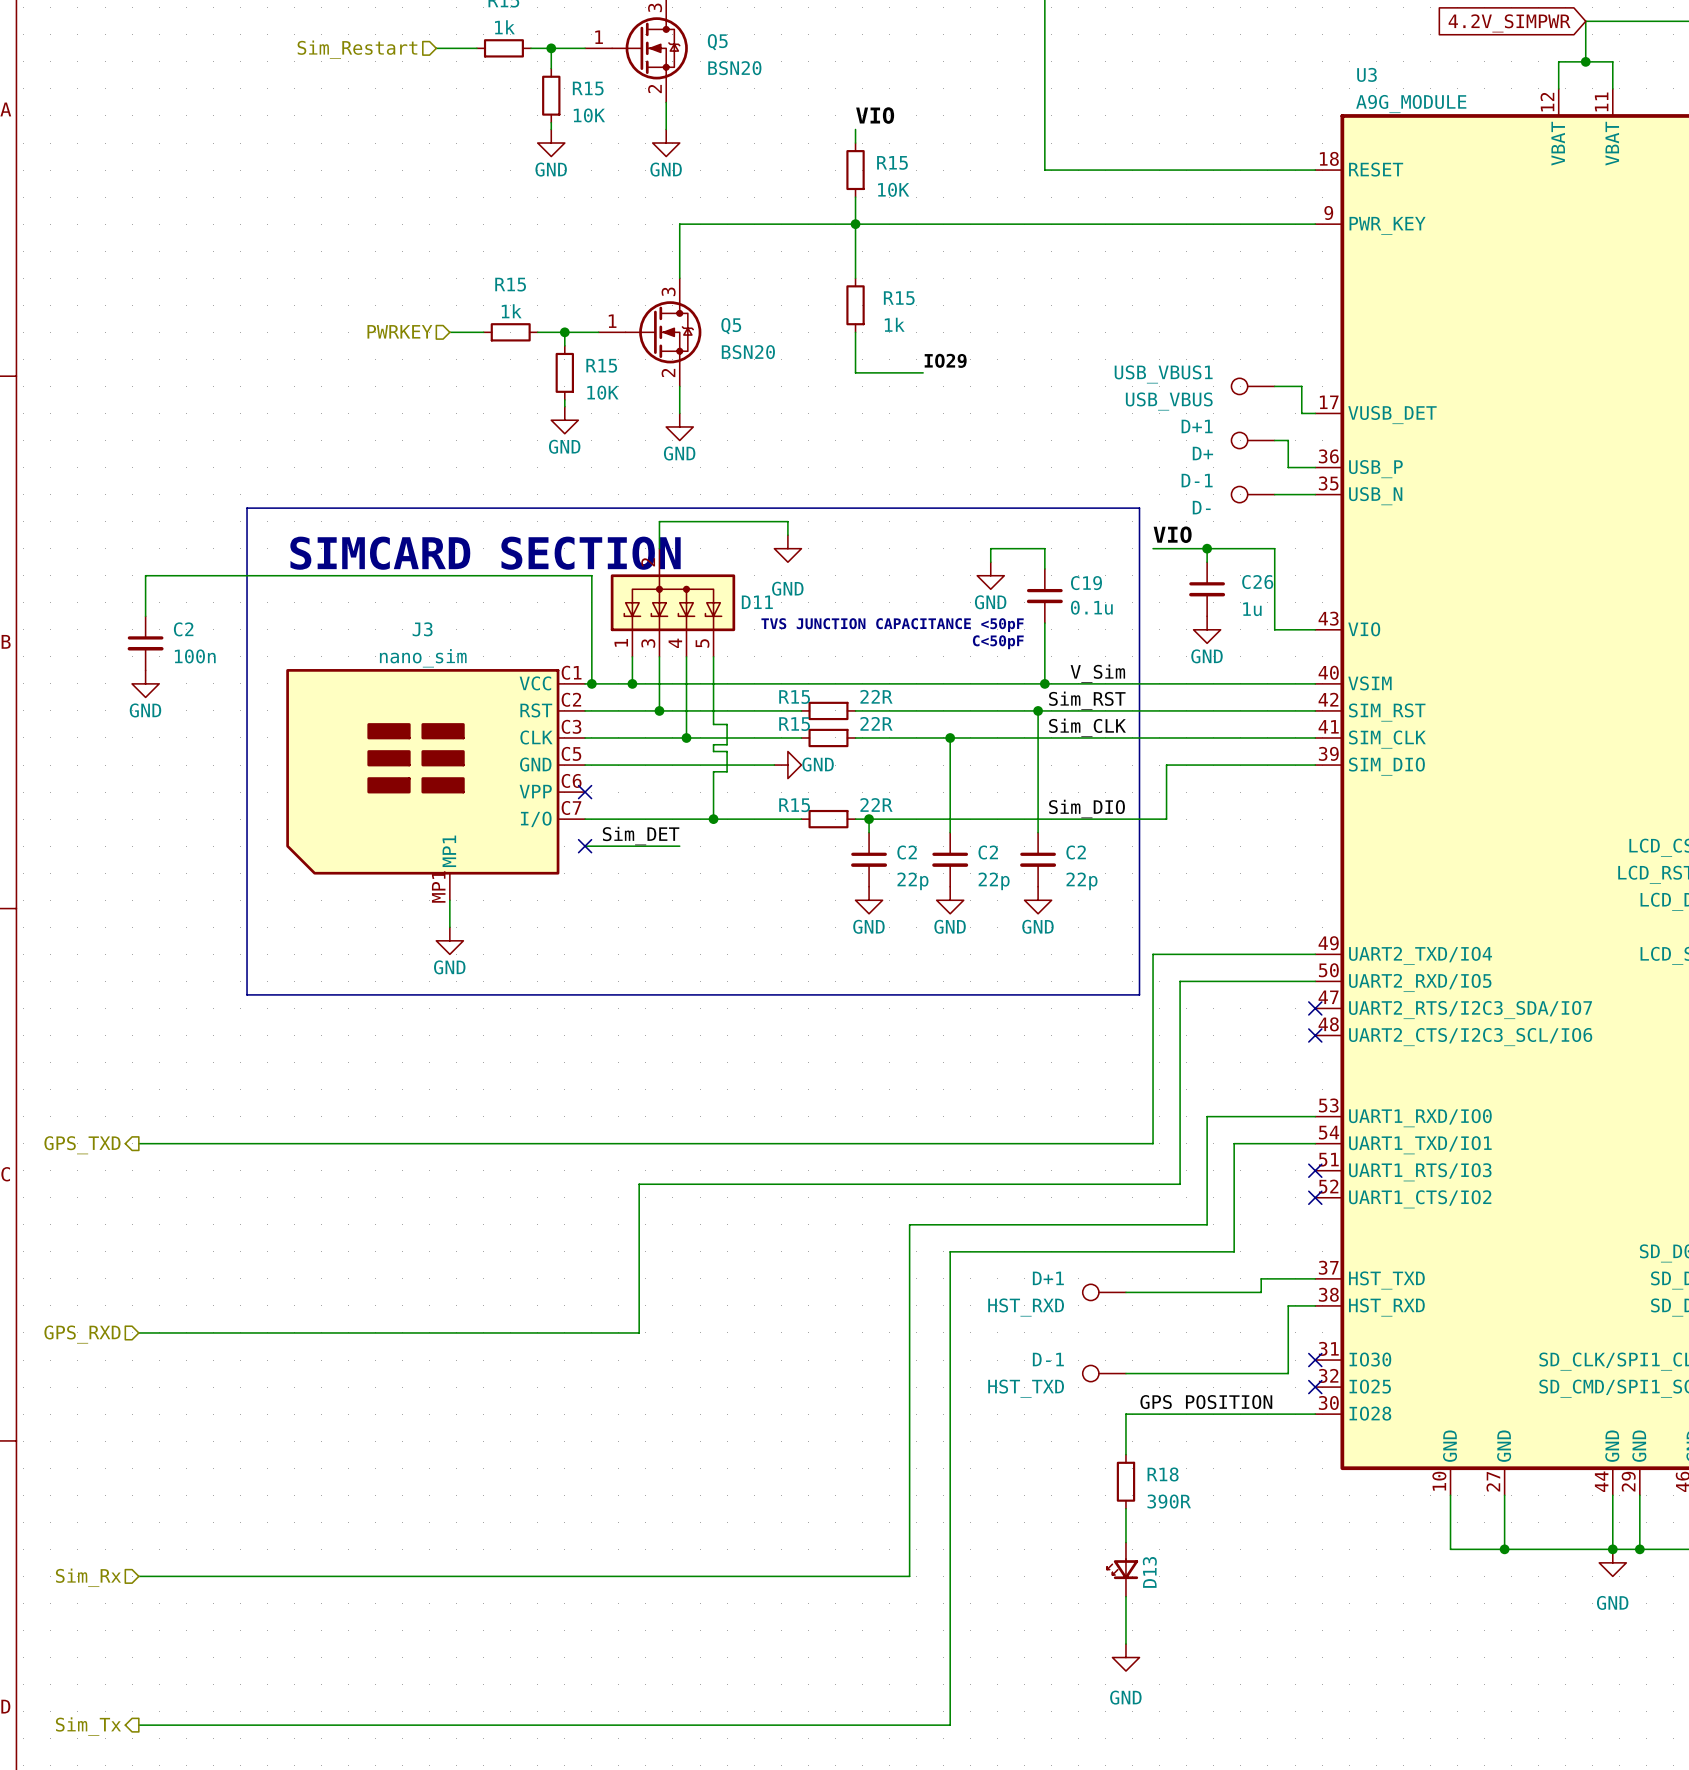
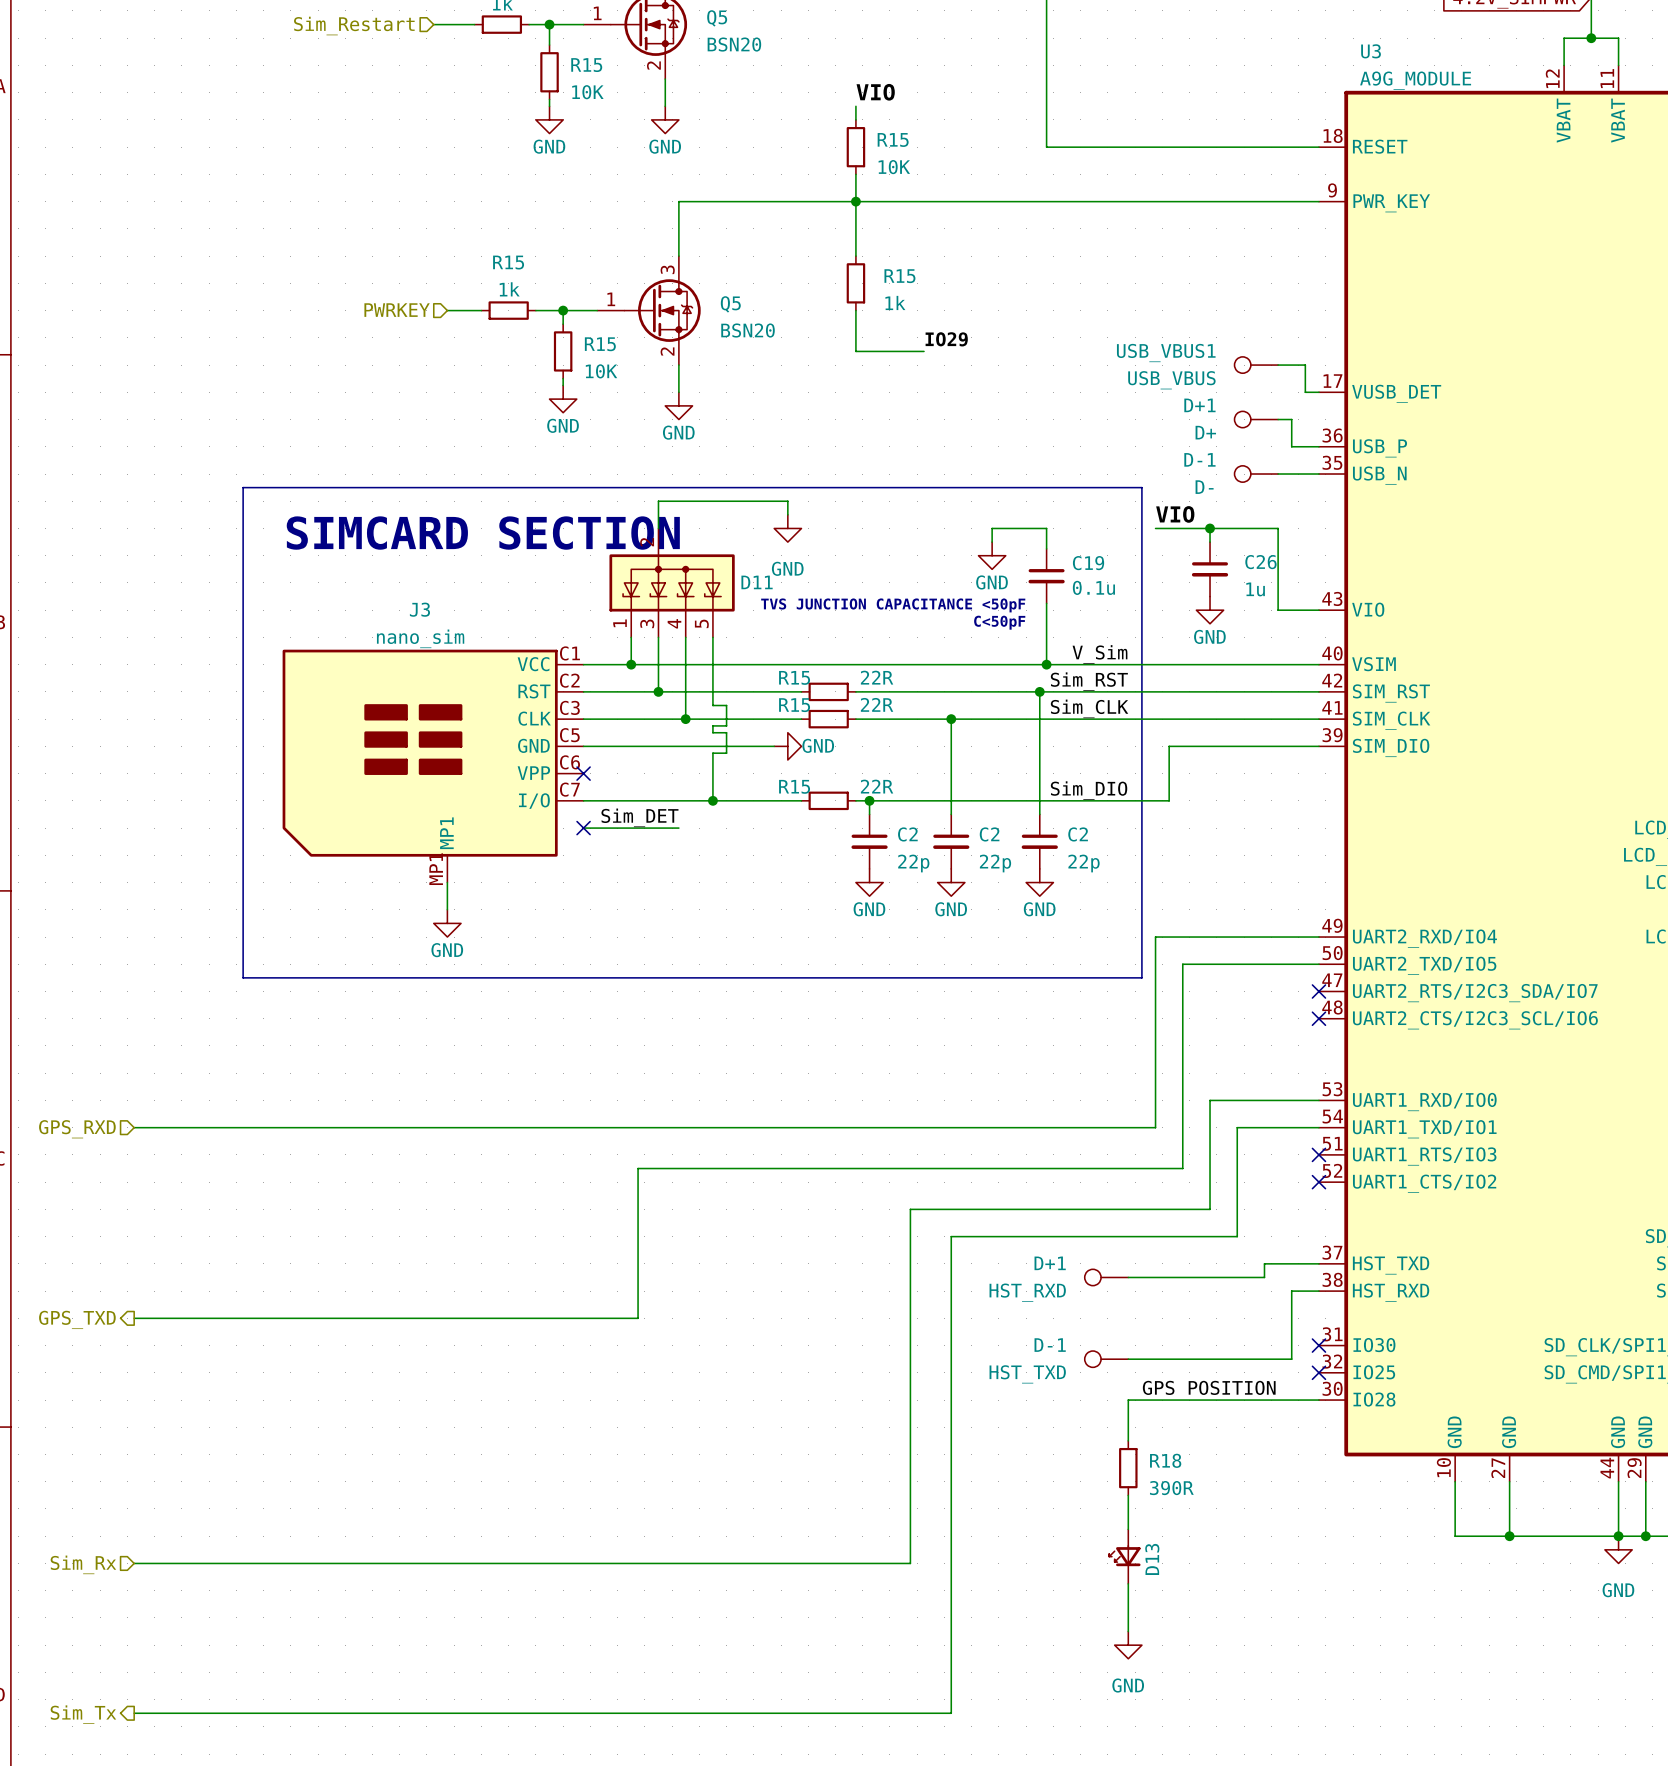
wire: (145, 616) (145, 575) (591, 575) (591, 683) -> none
C2: 100n (145, 643) -> none
power symbol: GND (145, 683) -> none
junction: (591, 683) -> none
U3 pin name: UART2_TXD/IO4 (1420, 955) -> UART2_RXD/IO4 (1424, 938)
U3 pin name: UART2_RXD/IO5 (1420, 982) -> UART2_TXD/IO5 (1424, 965)
hierarchical label shape: output (82, 1145) -> input (77, 1129)
hierarchical label: GPS_TXD (82, 1145) -> GPS_RXD (77, 1129)
hierarchical label shape: input (82, 1334) -> output (77, 1319)
hierarchical label: GPS_RXD (82, 1334) -> GPS_TXD (77, 1319)

